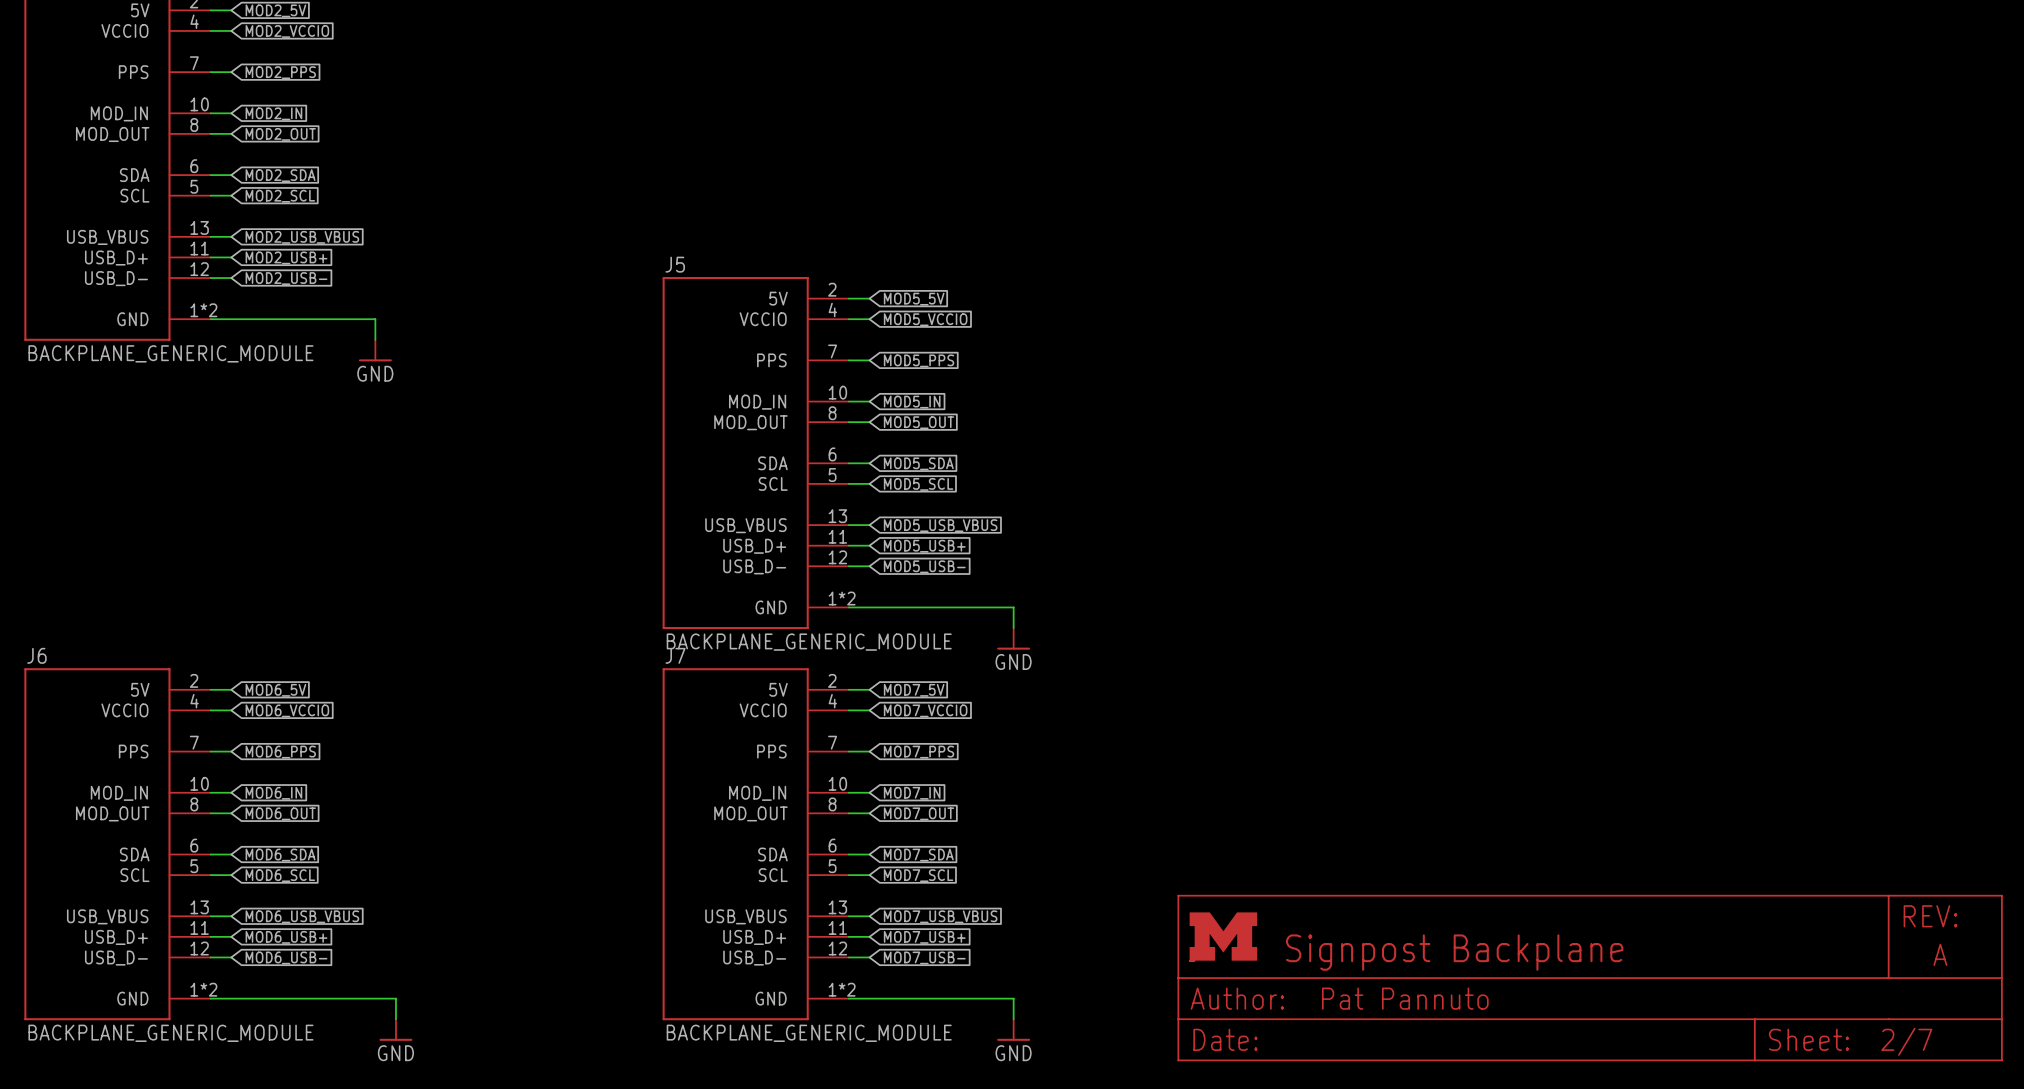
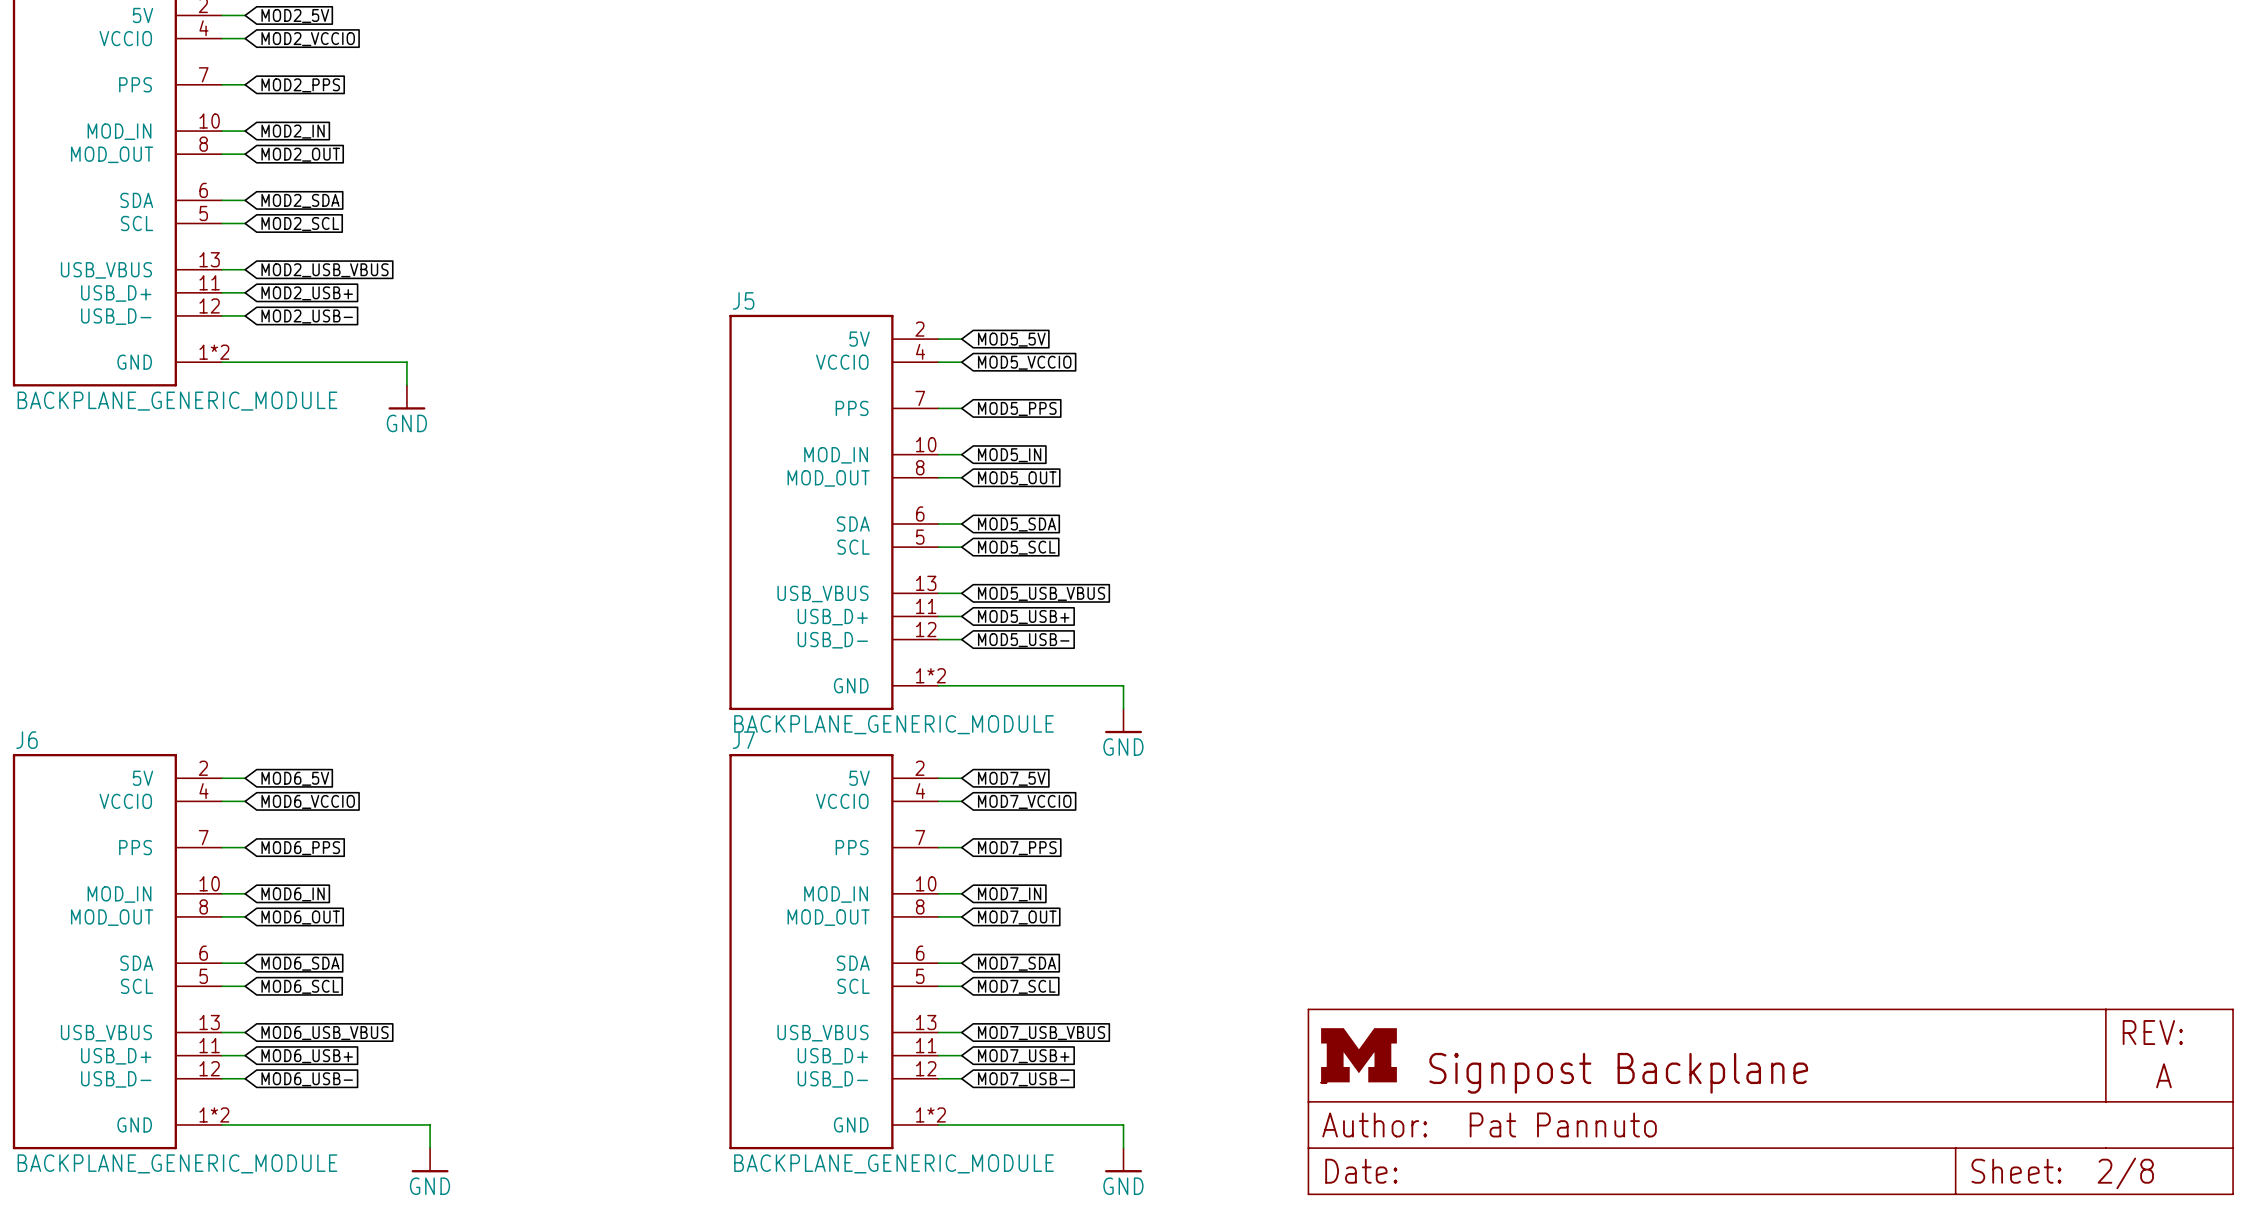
part text: 2/7 (1906, 1041) -> 2/8 (2125, 1173)

